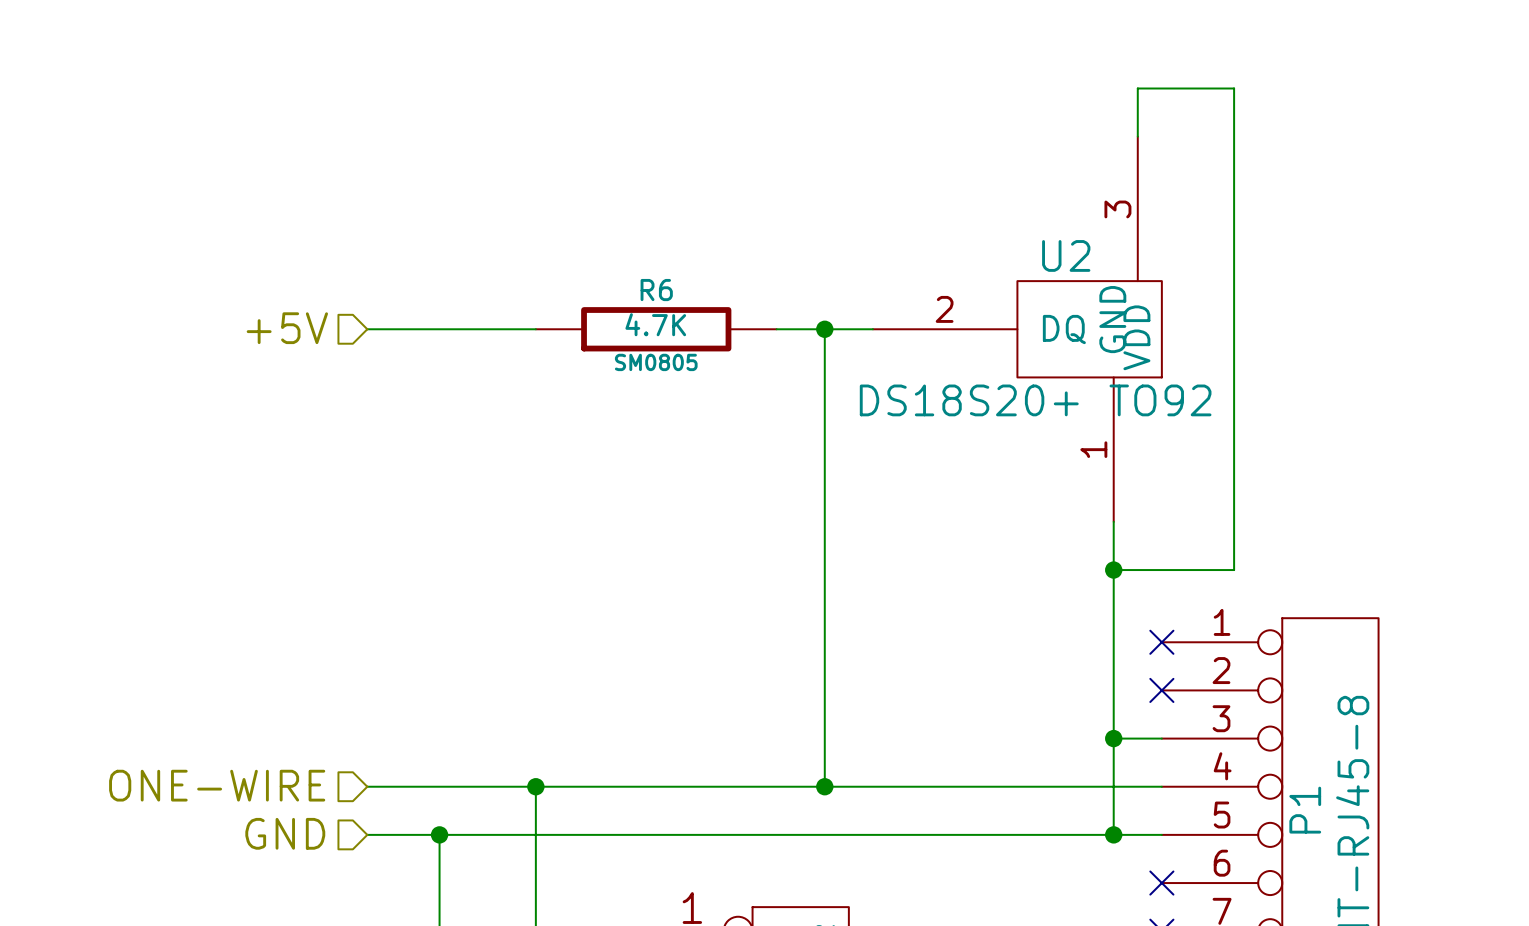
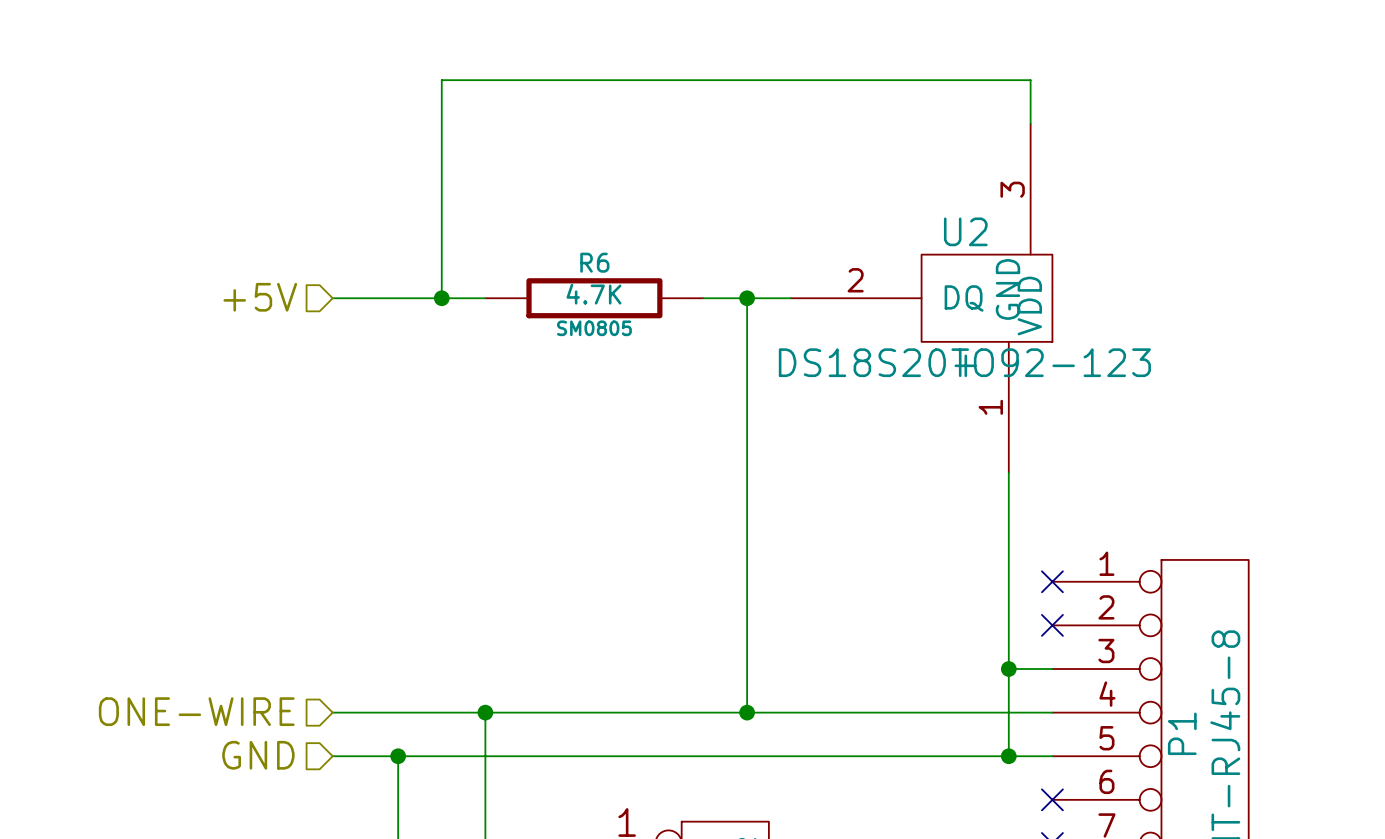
wire: (1137, 88) (1234, 88) (1234, 570) (1113, 570) -> (1030, 80) (441, 80) (441, 298)
junction: none -> (441, 298)
U2 text: TO92 (1160, 400) -> TO92-123 (1051, 362)
junction: (1113, 570) -> none

